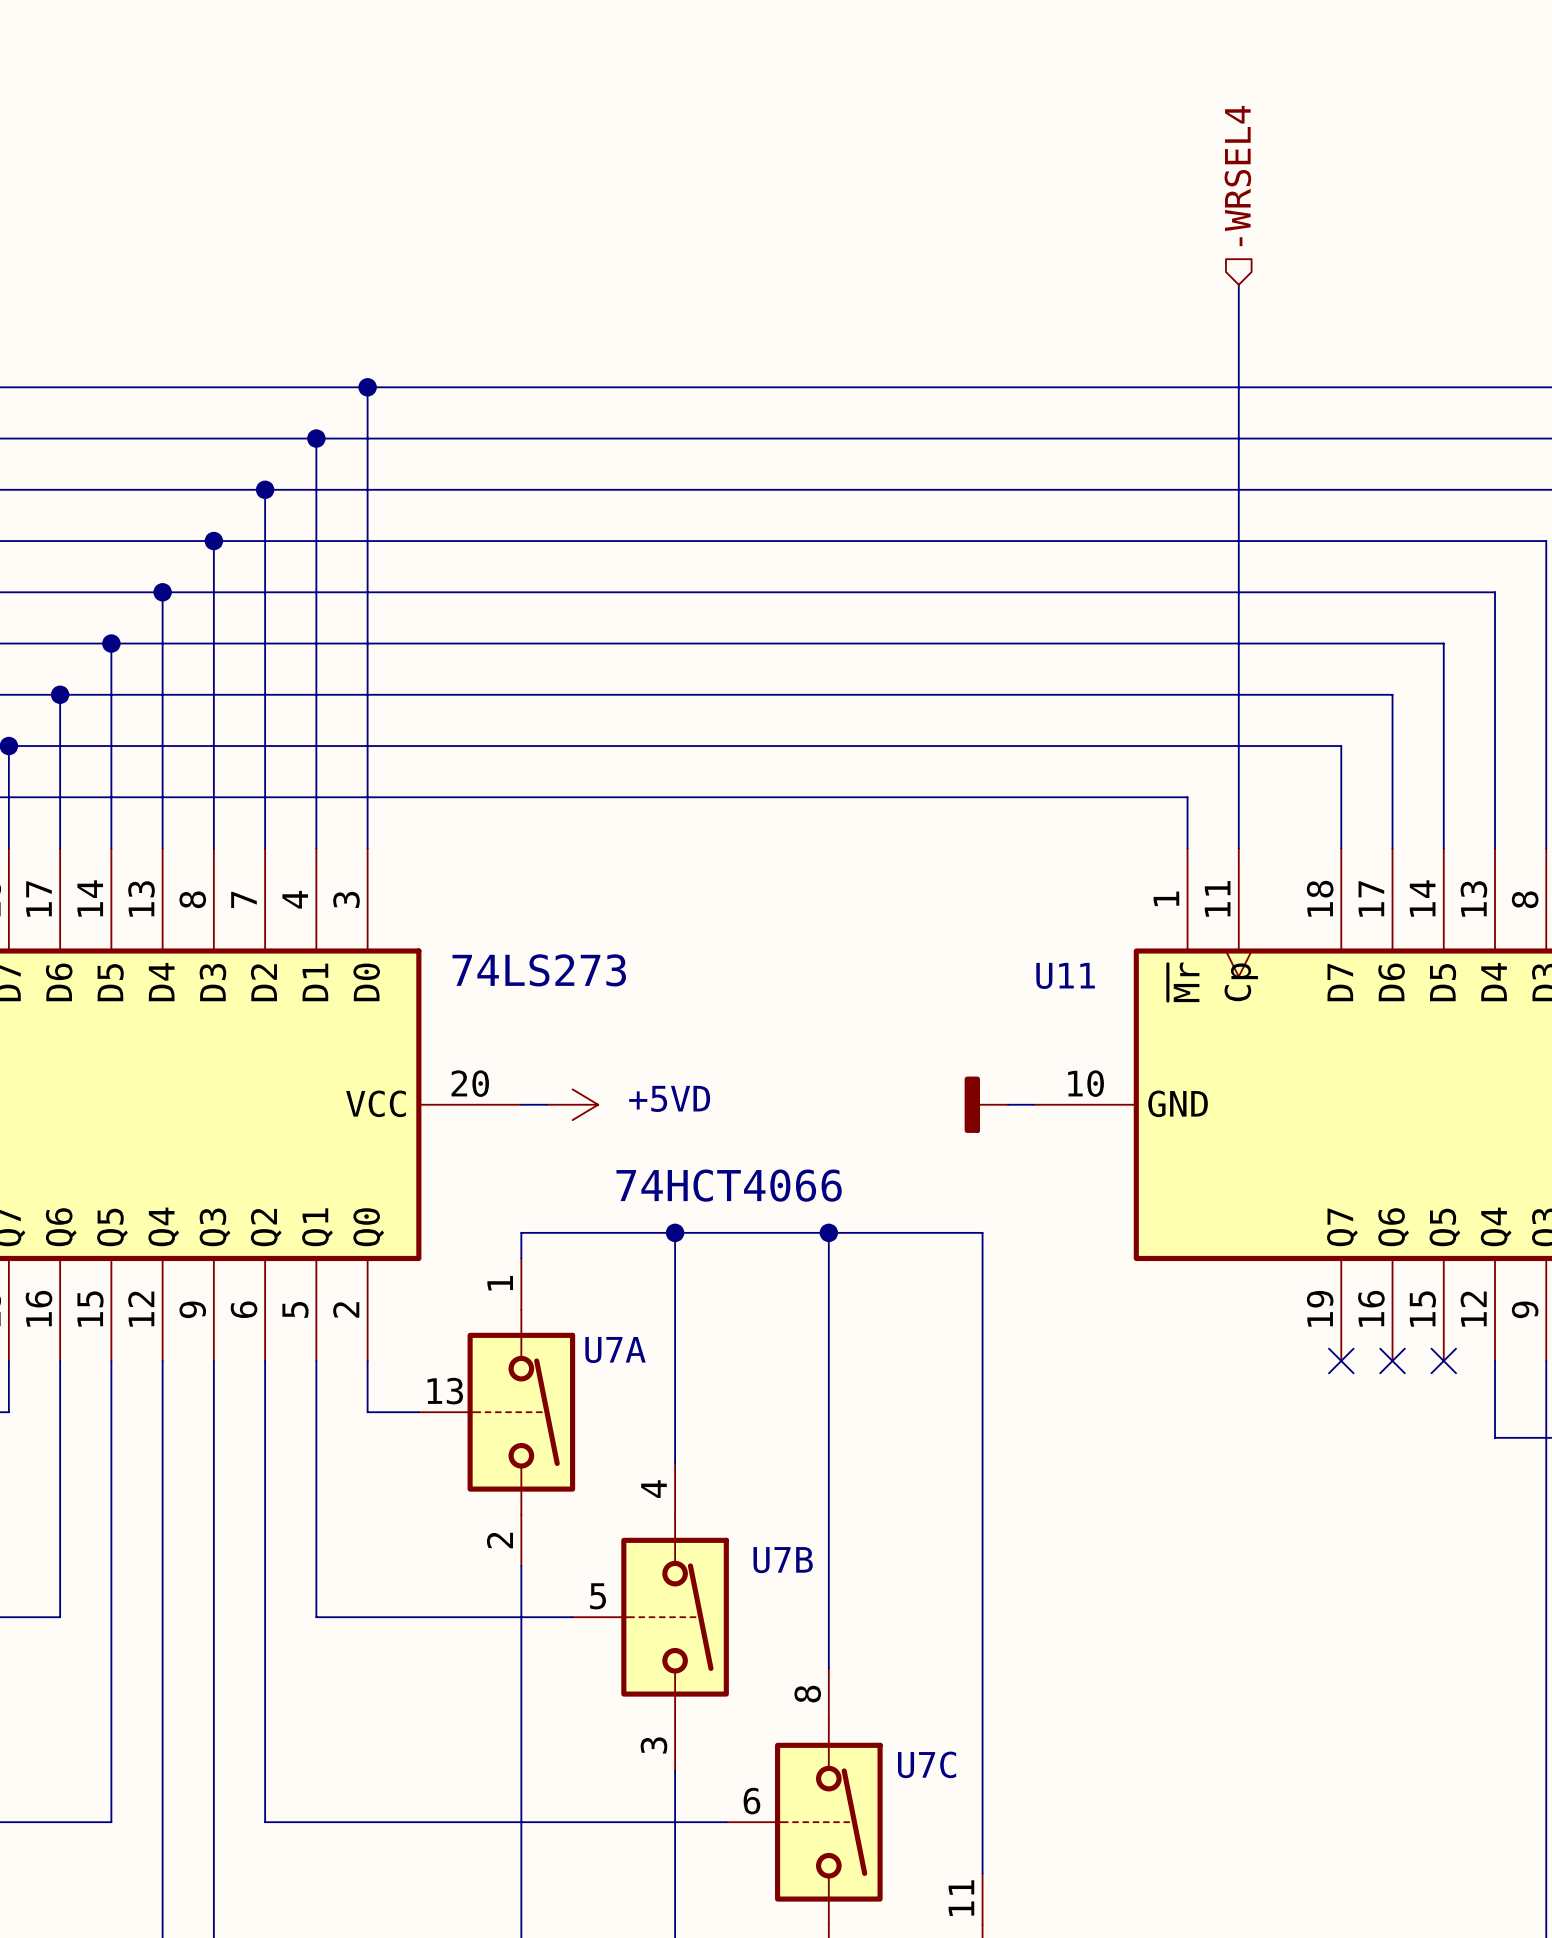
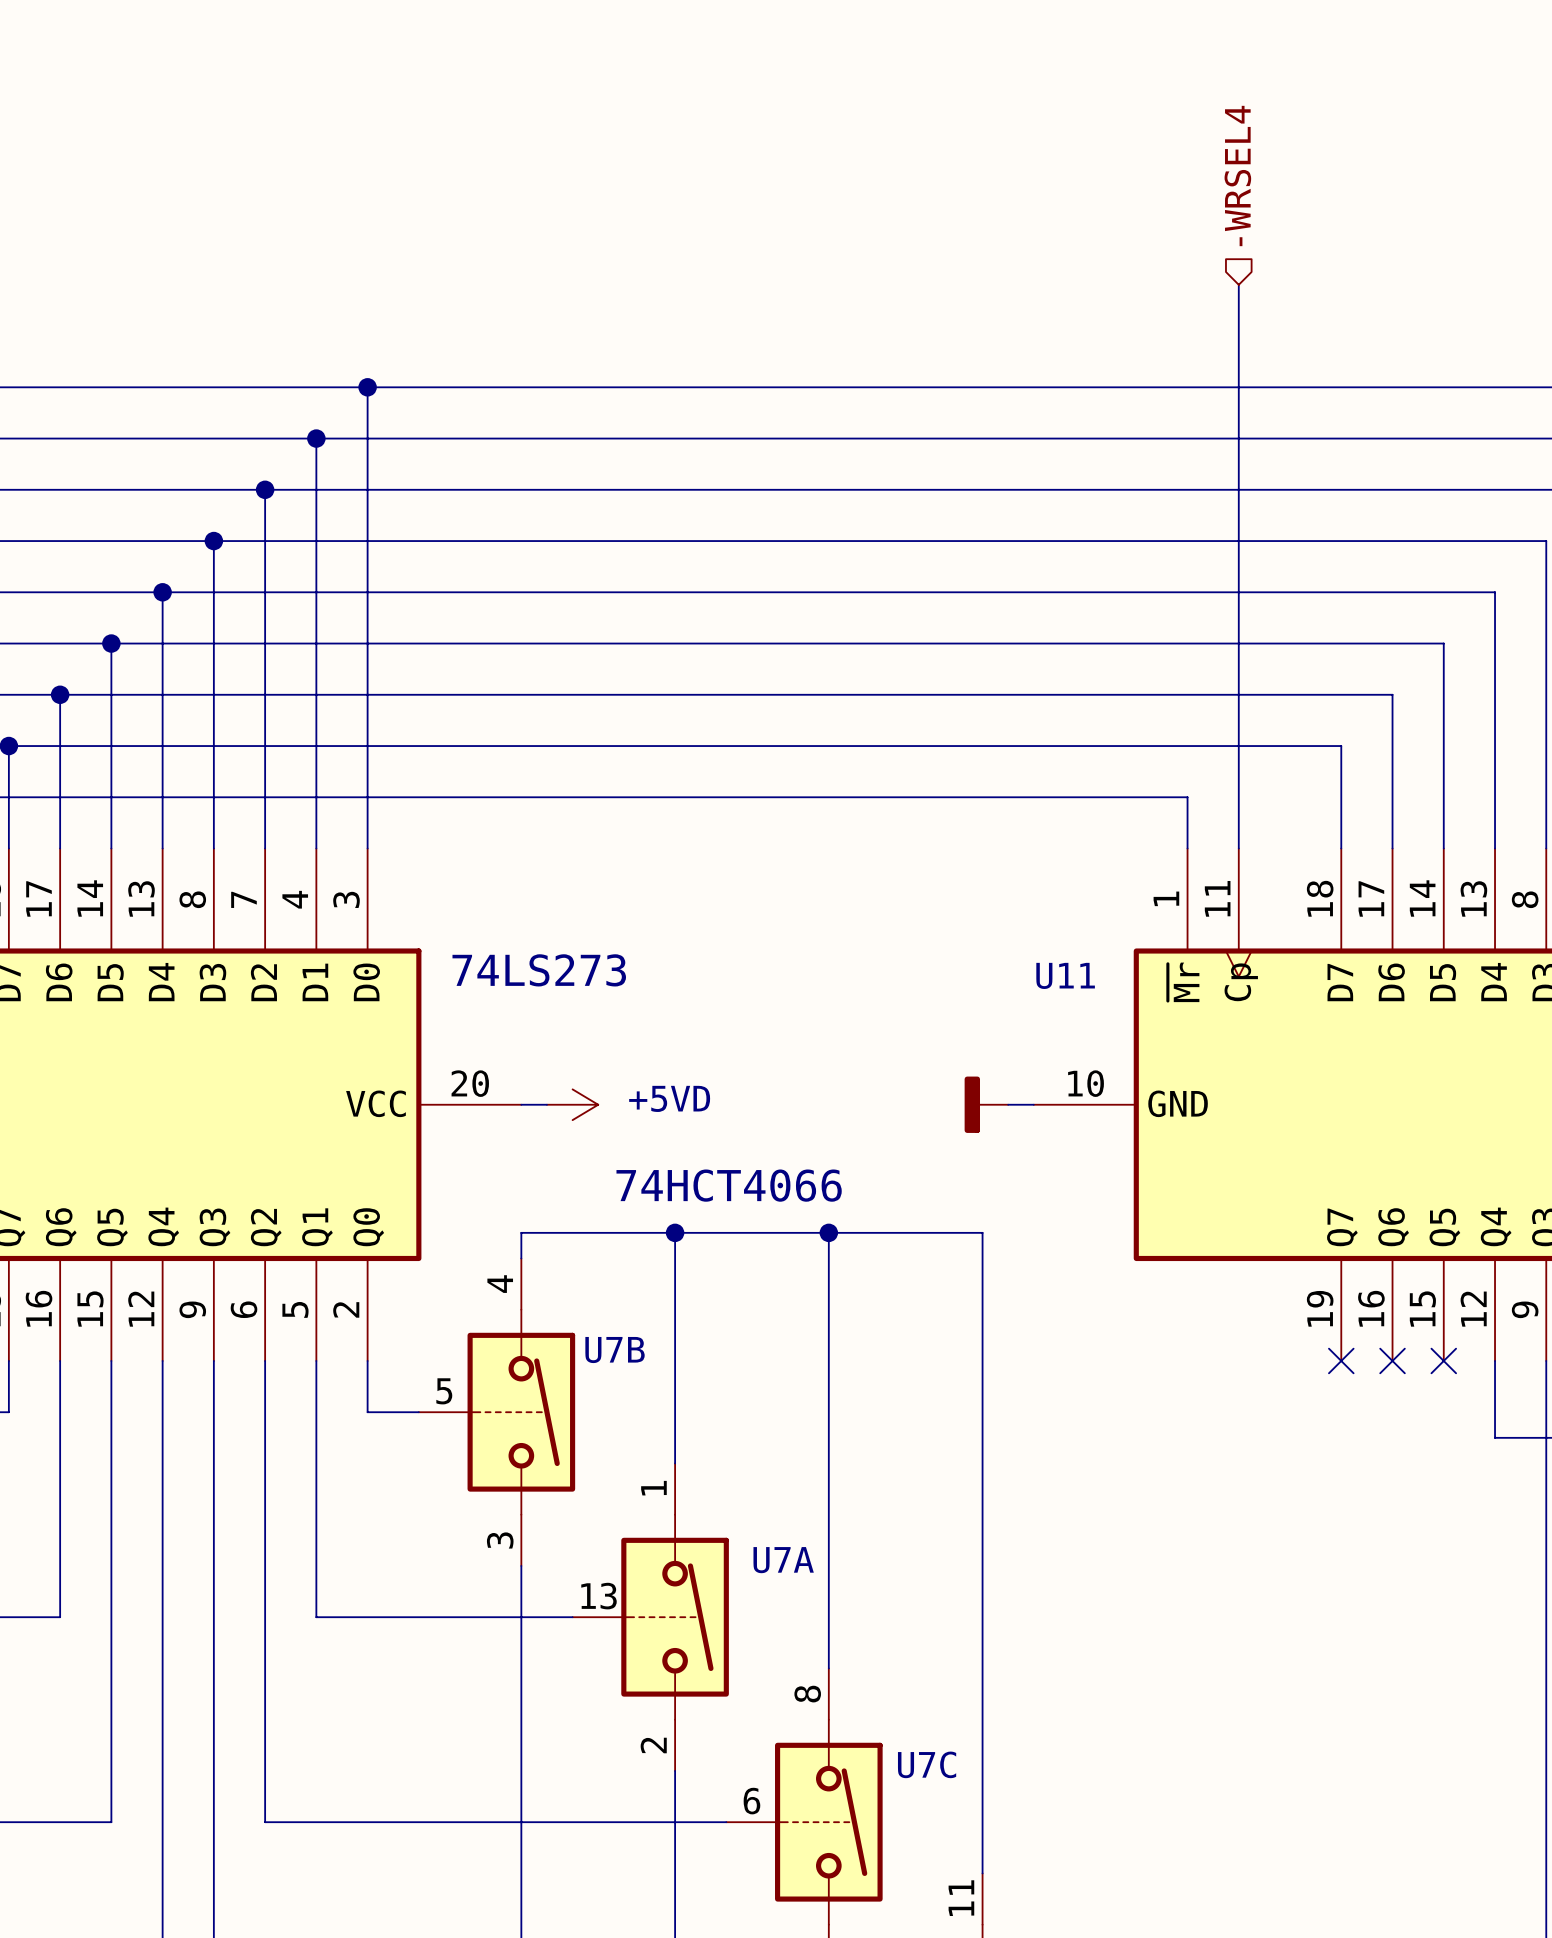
U7A name position: U7A (615, 1350) -> U7A (783, 1560)
U7A position: (497, 1412) -> (650, 1617)
U7B name position: U7B (783, 1560) -> U7B (615, 1350)
U7B position: (650, 1617) -> (497, 1412)

